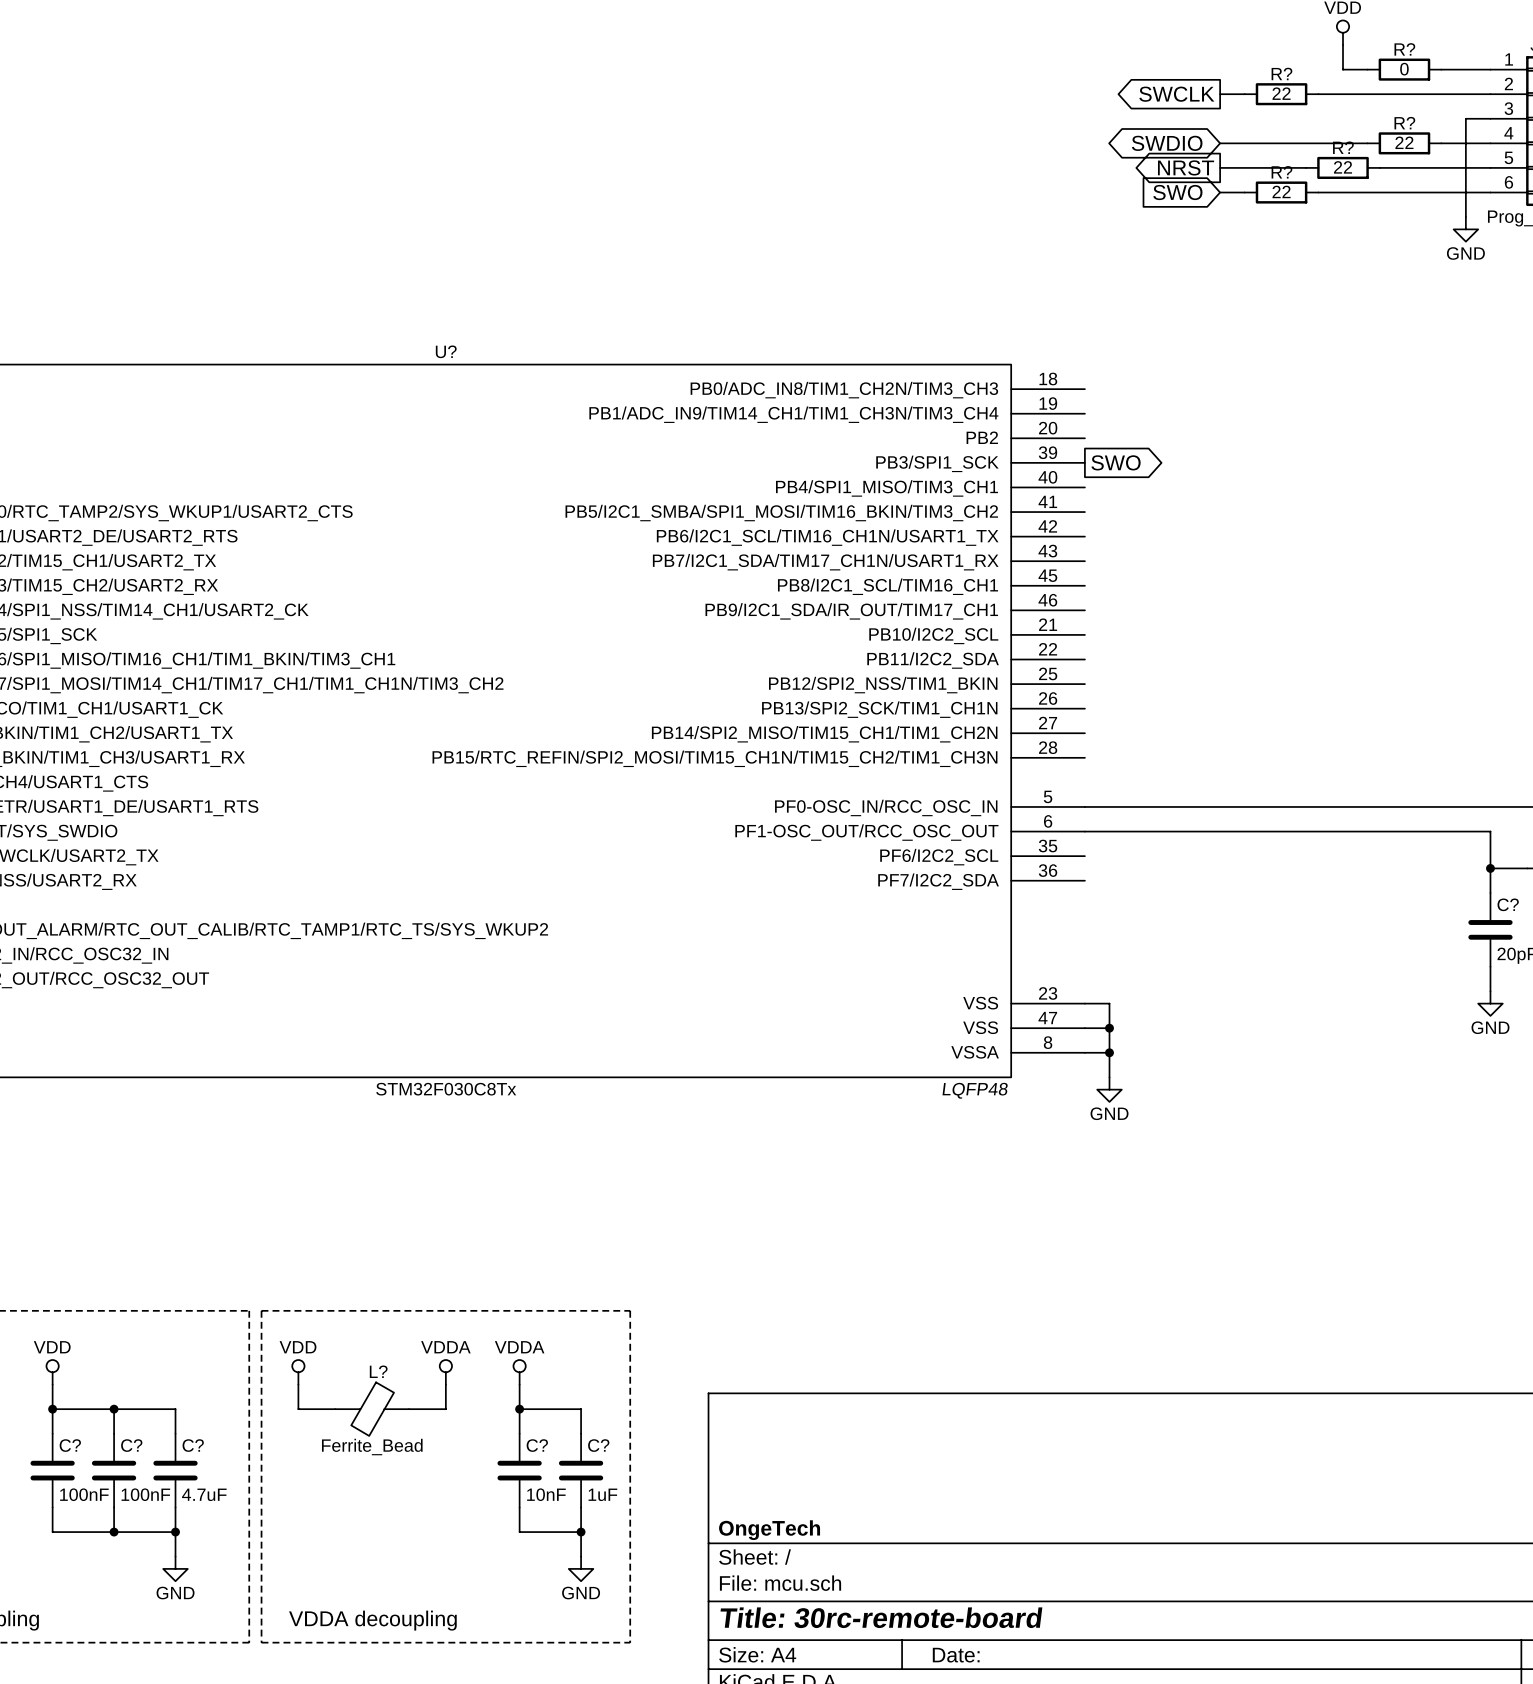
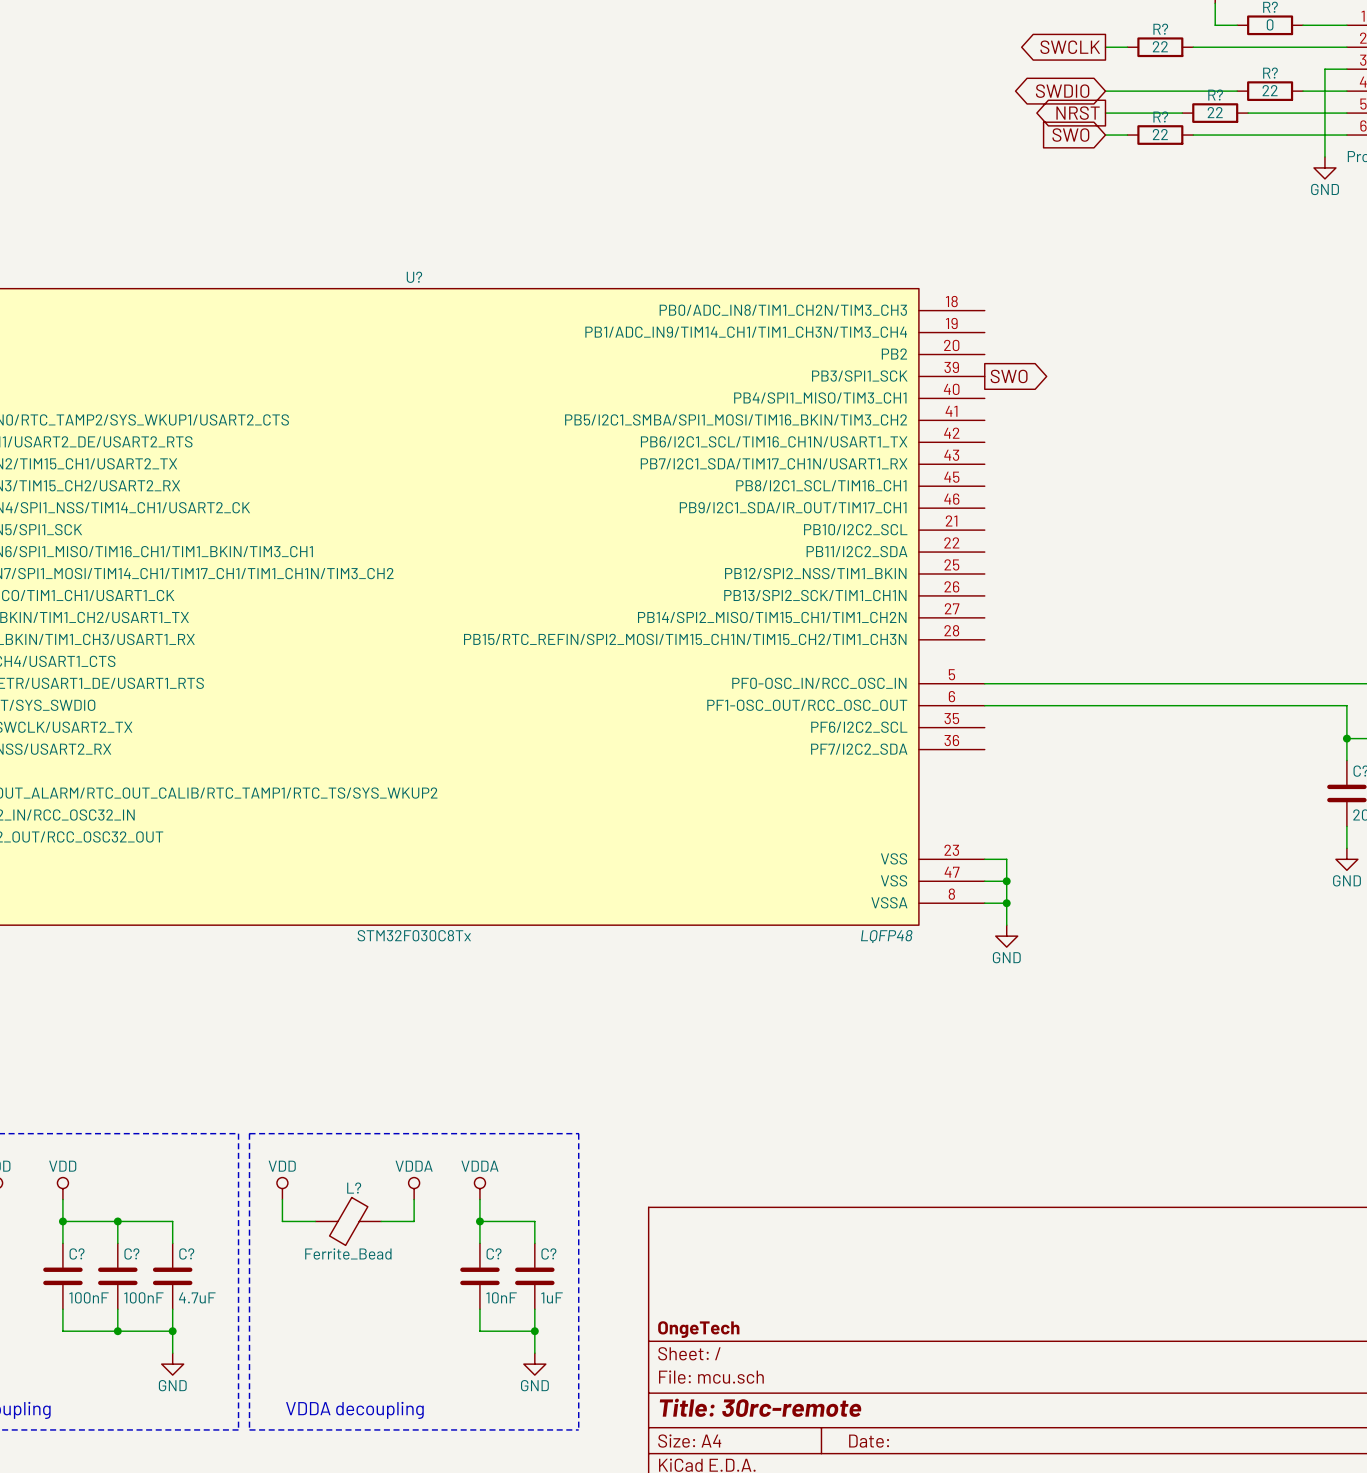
title block: Title: 30rc-remote-board (881, 1617) -> Title: 30rc-remote (760, 1407)

